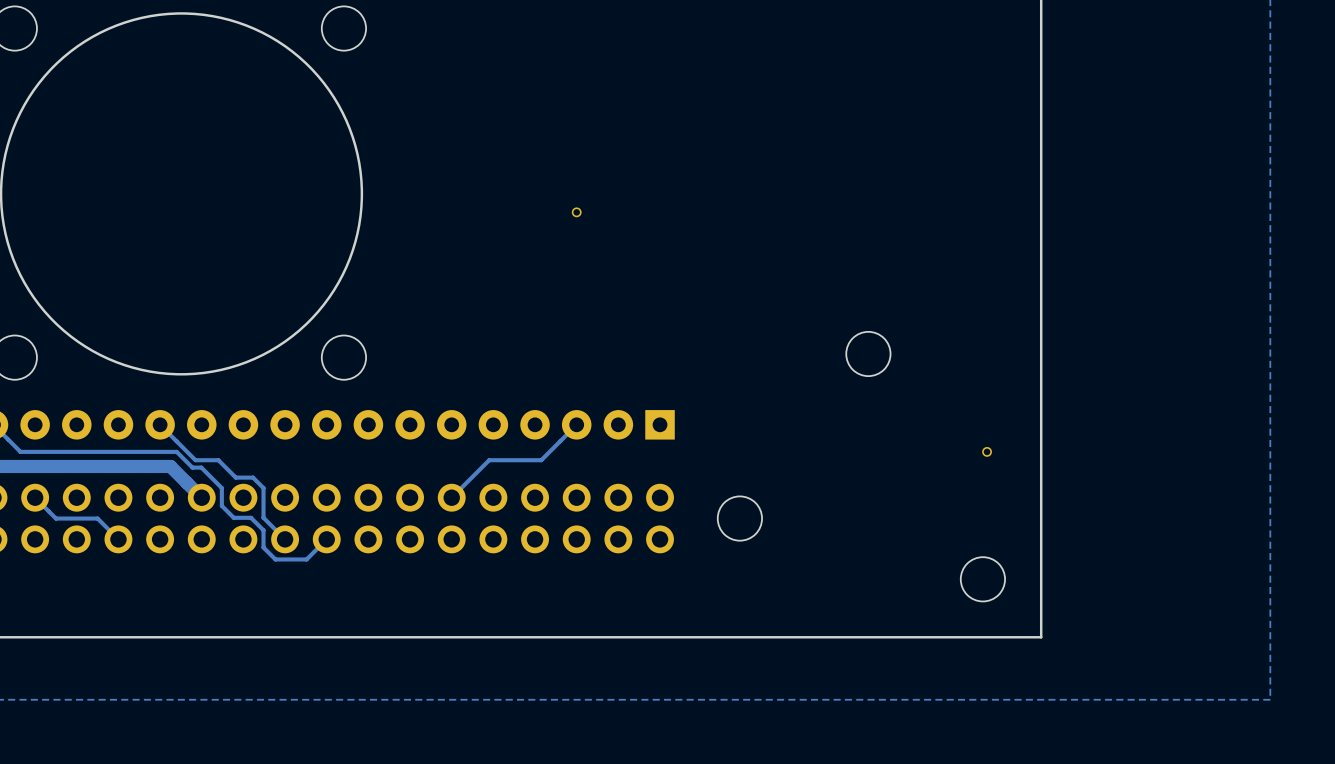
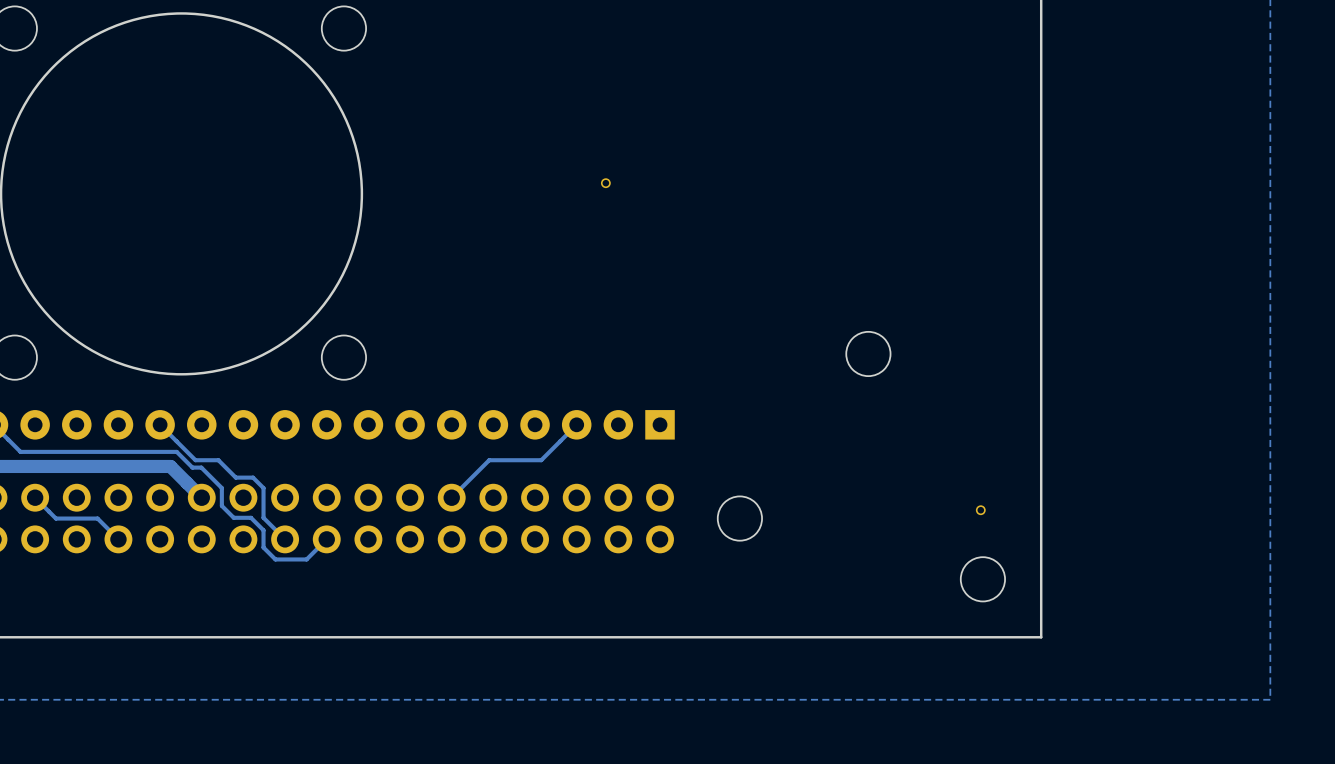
part position: (576, 212) -> (605, 183)
part position: (987, 451) -> (980, 510)

